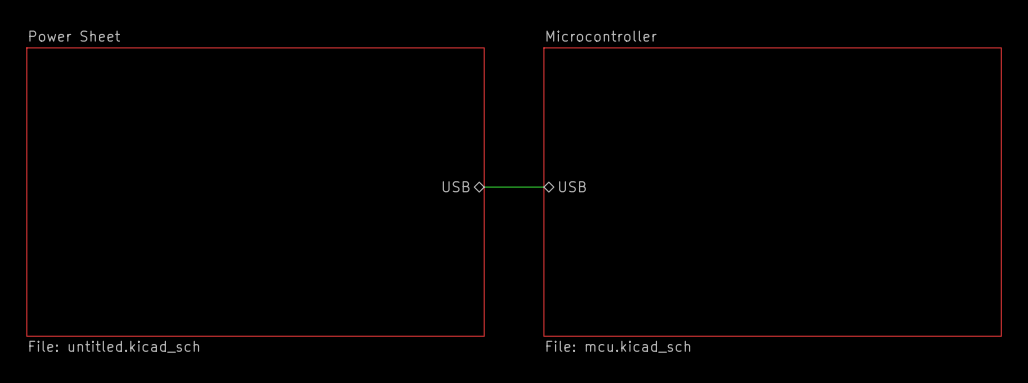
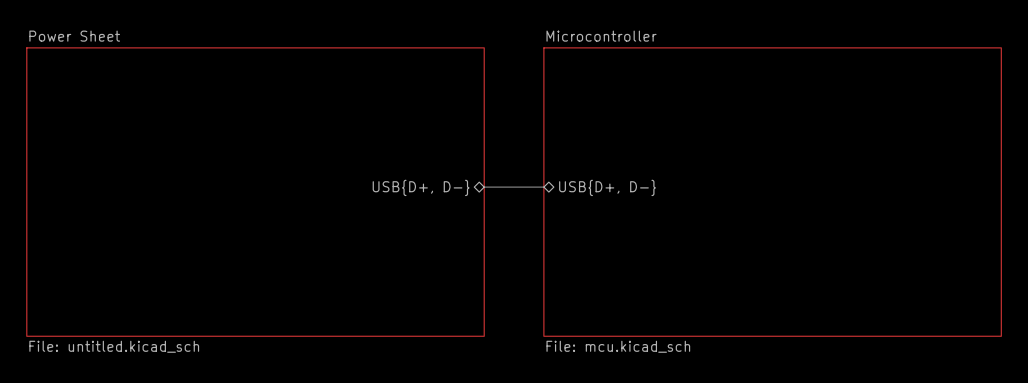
sheet pin: USB (456, 186) -> USB{D+, D-} (421, 187)
sheet pin: USB (572, 186) -> USB{D+, D-} (607, 187)
bus: none -> (484, 187) (543, 187)

